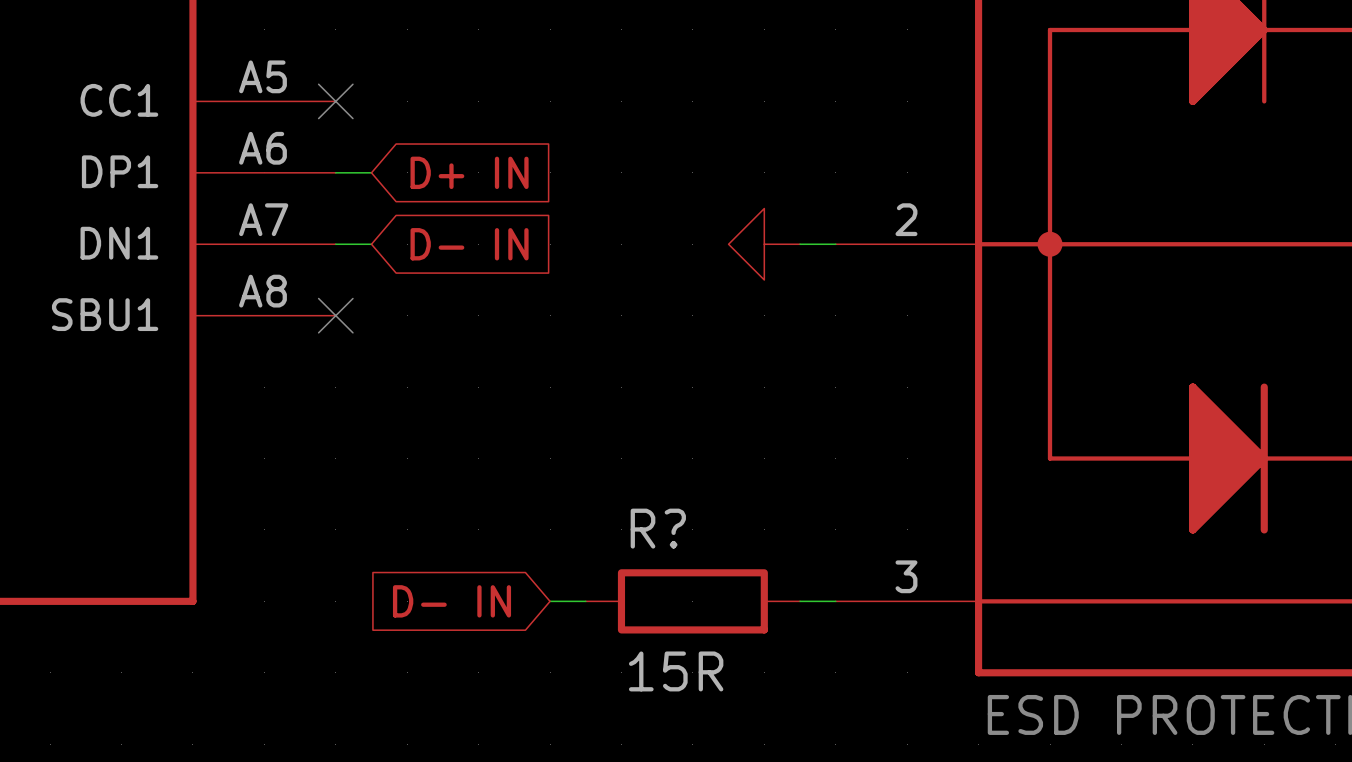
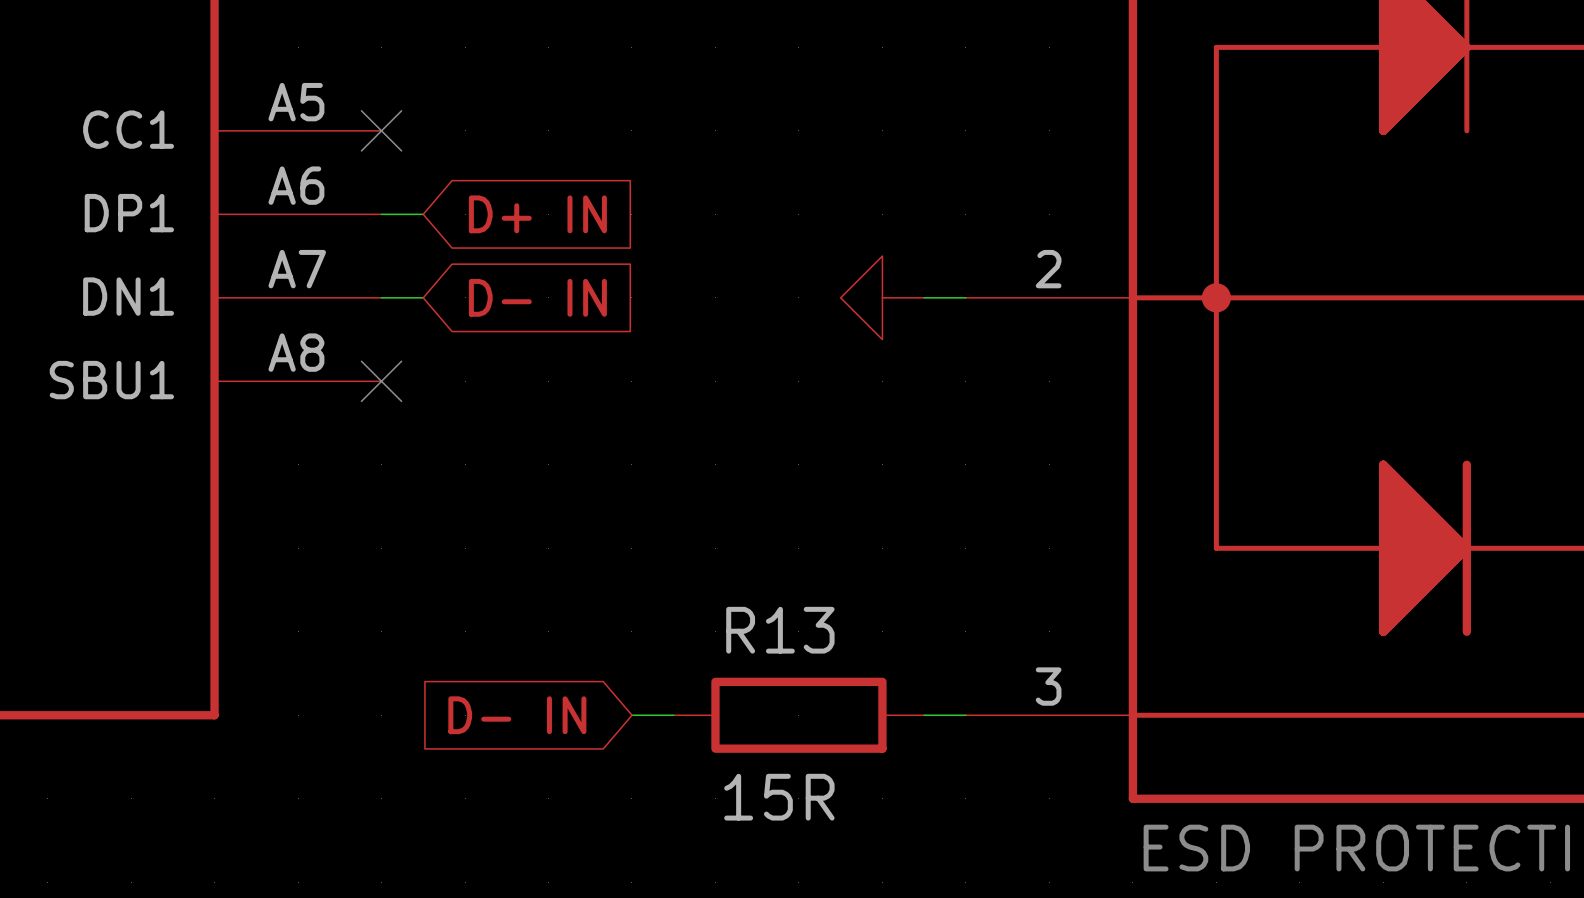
R? name: R? (658, 528) -> R13 (780, 630)

